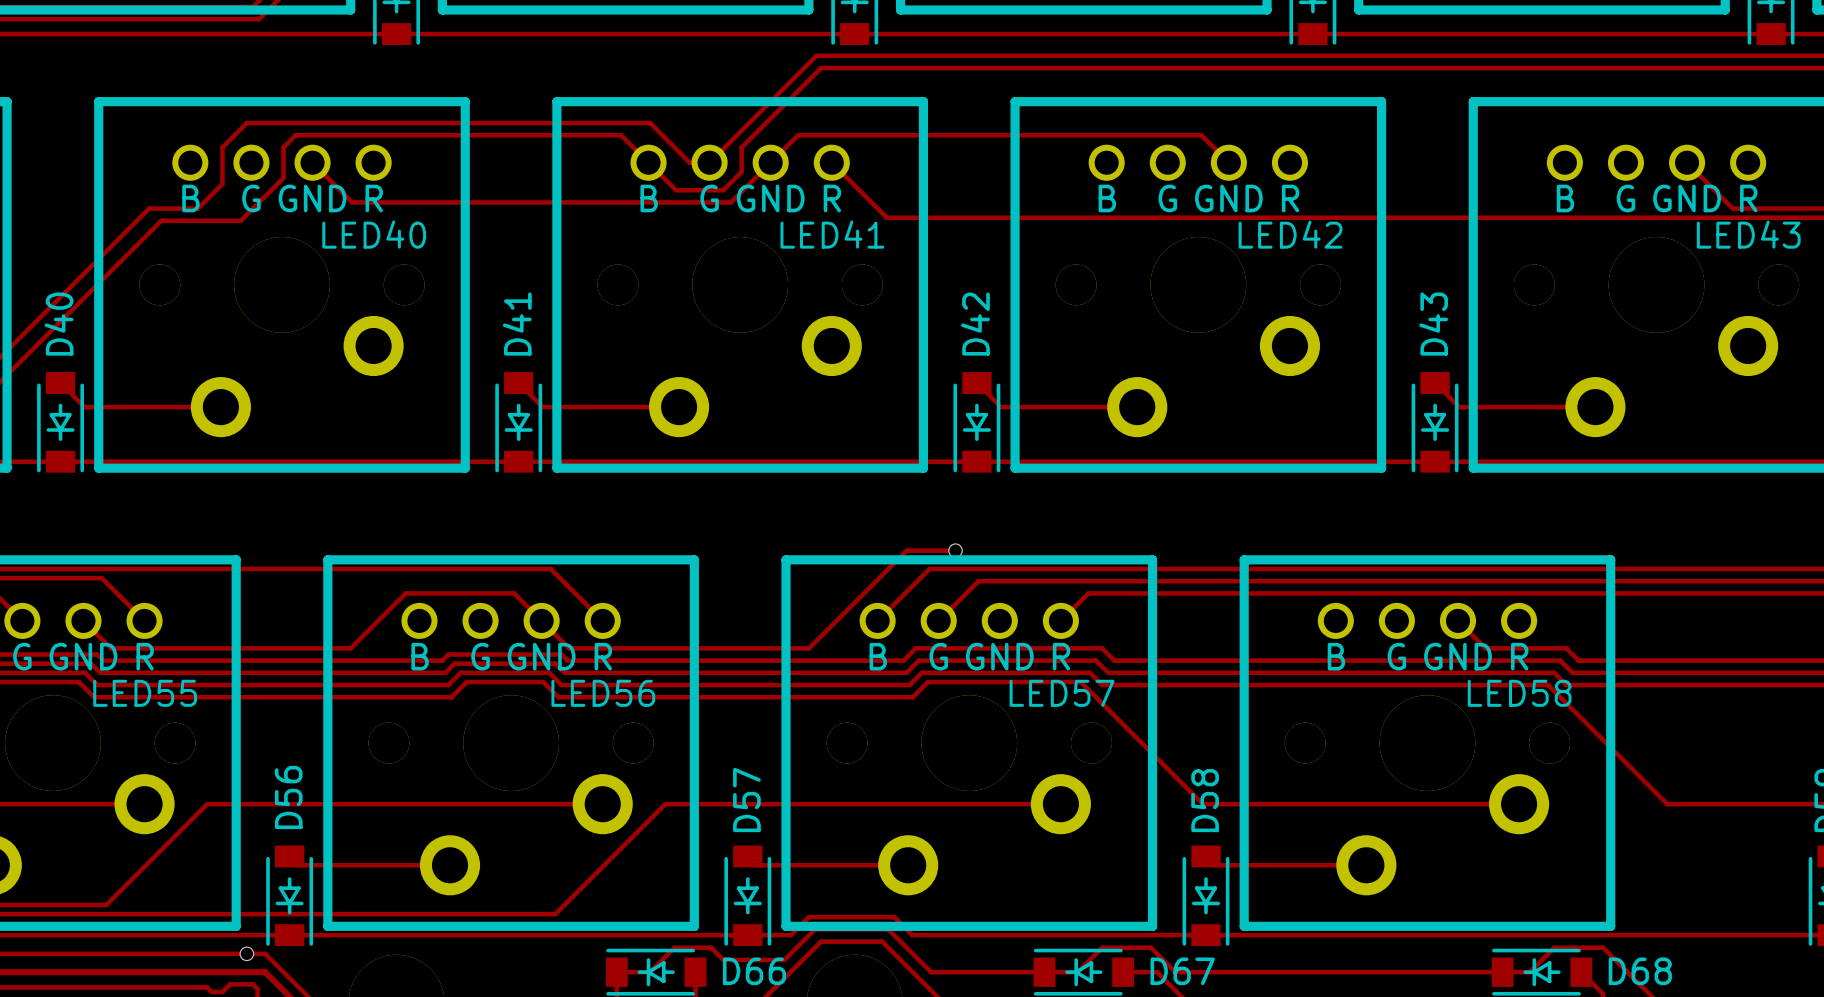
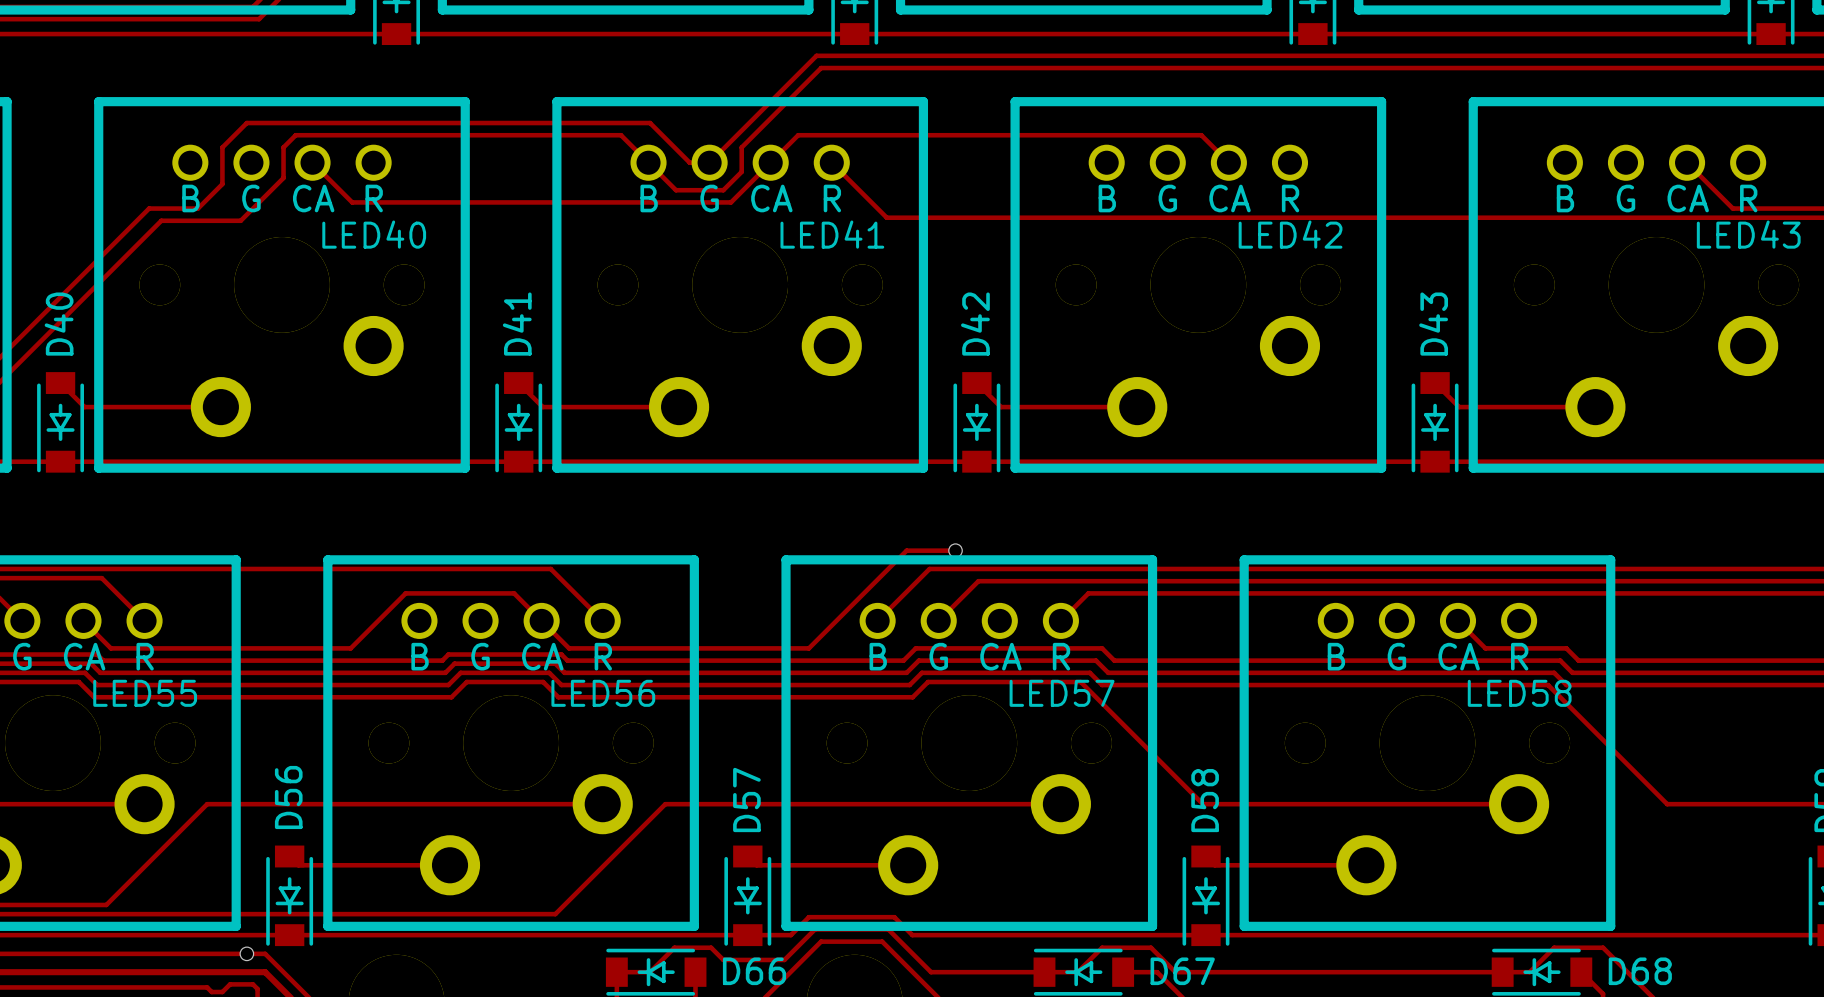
LED40 text: GND (312, 198) -> CA (313, 198)
LED41 text: GND (770, 198) -> CA (771, 198)
LED42 text: GND (1228, 198) -> CA (1230, 198)
LED43 text: GND (1687, 198) -> CA (1688, 198)
LED55 text: GND (83, 656) -> CA (84, 656)
LED56 text: GND (541, 656) -> CA (542, 656)
LED57 text: GND (999, 656) -> CA (1000, 656)
LED58 text: GND (1458, 656) -> CA (1459, 656)

